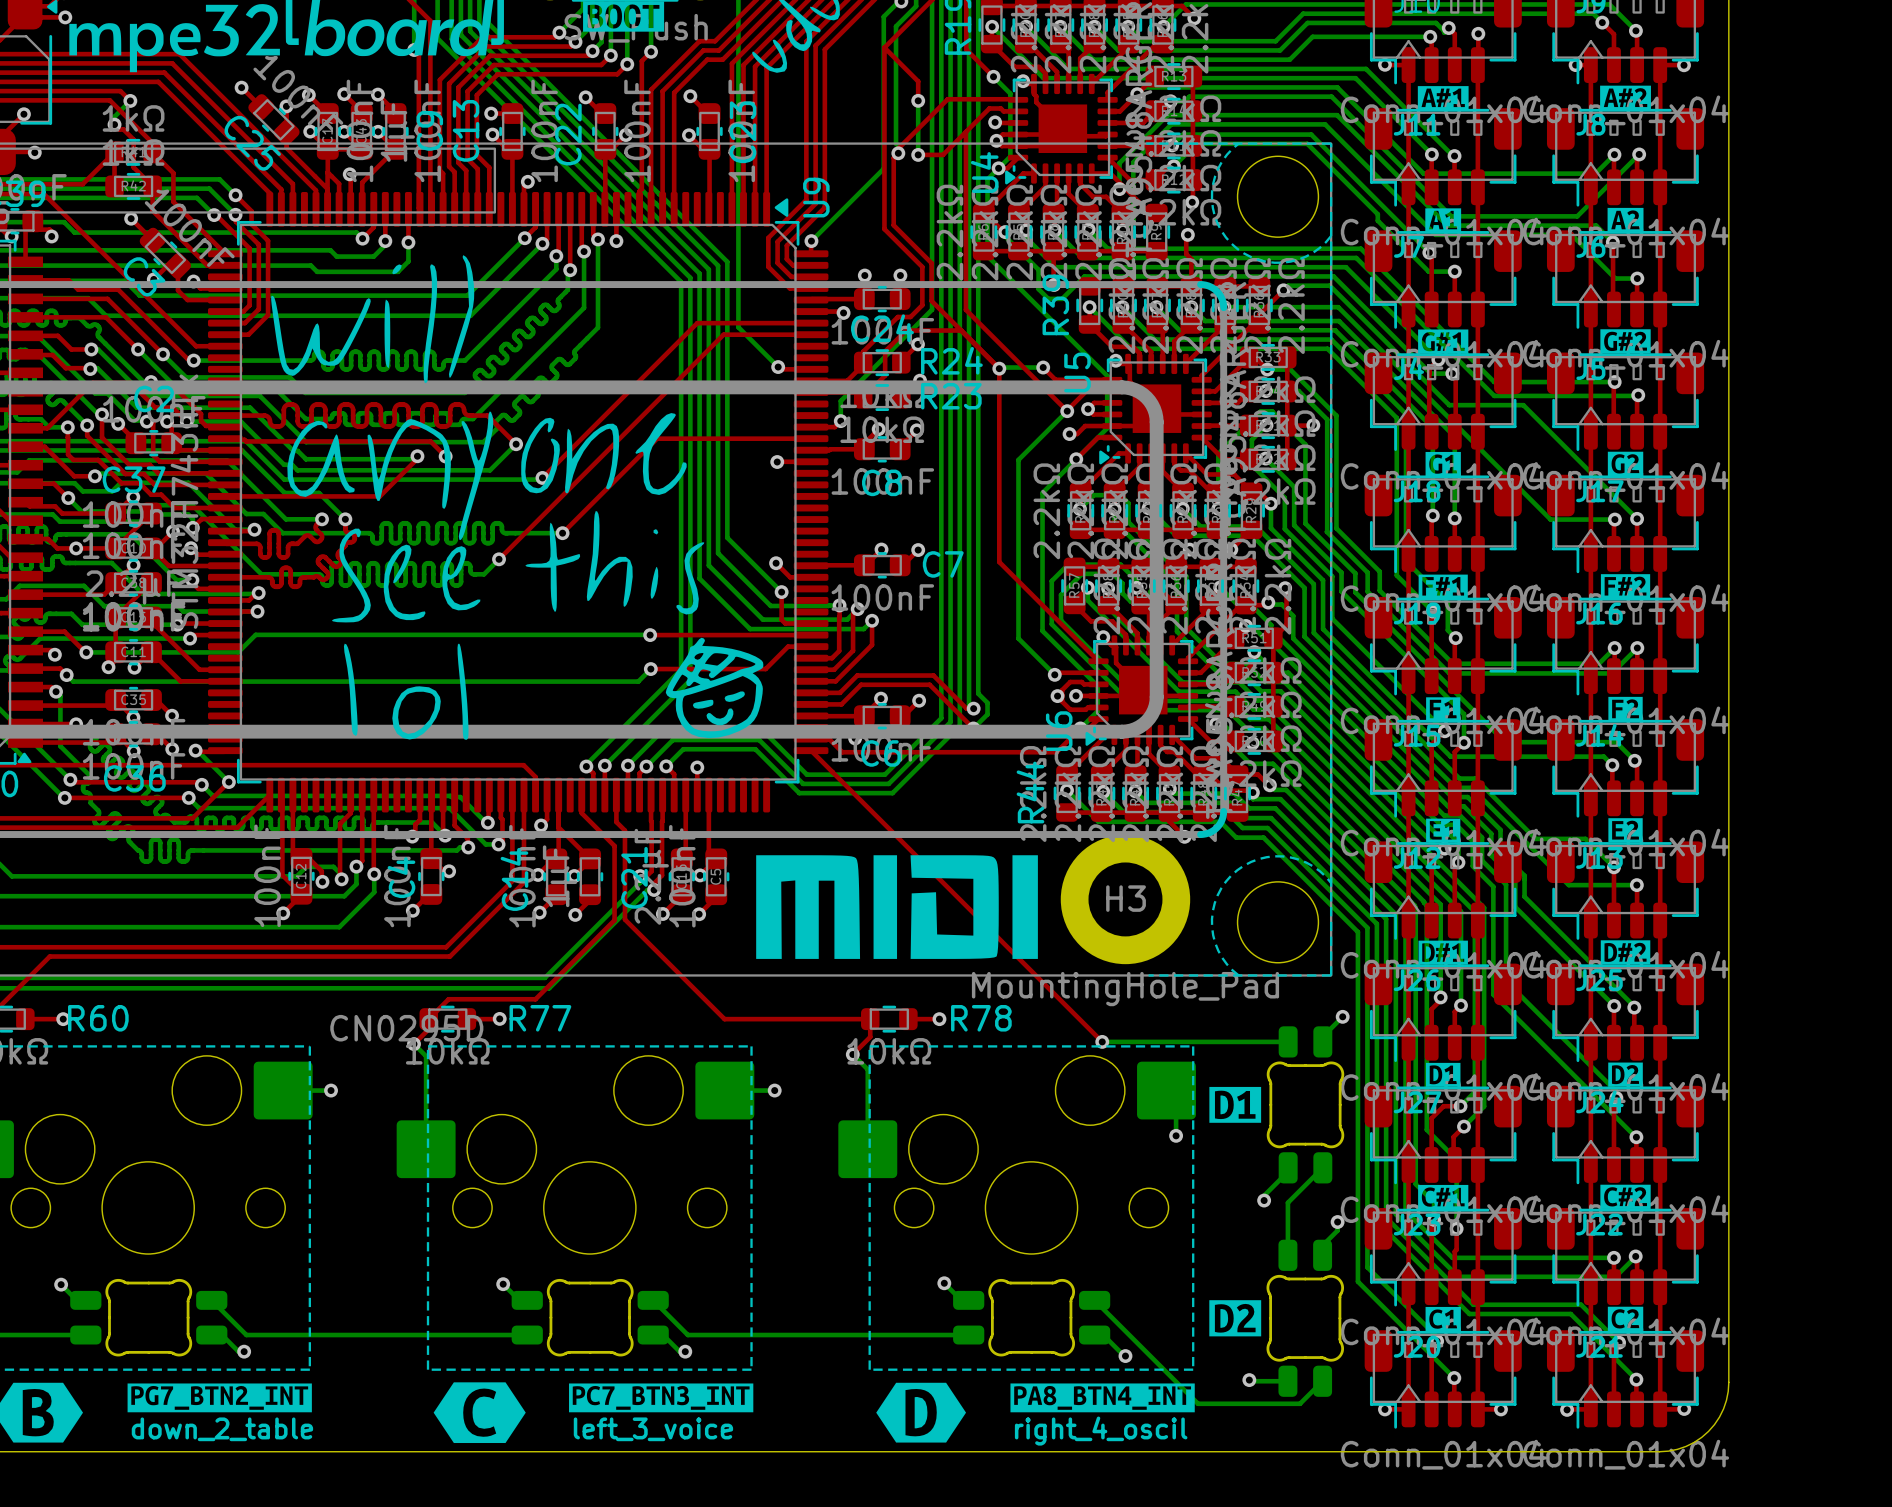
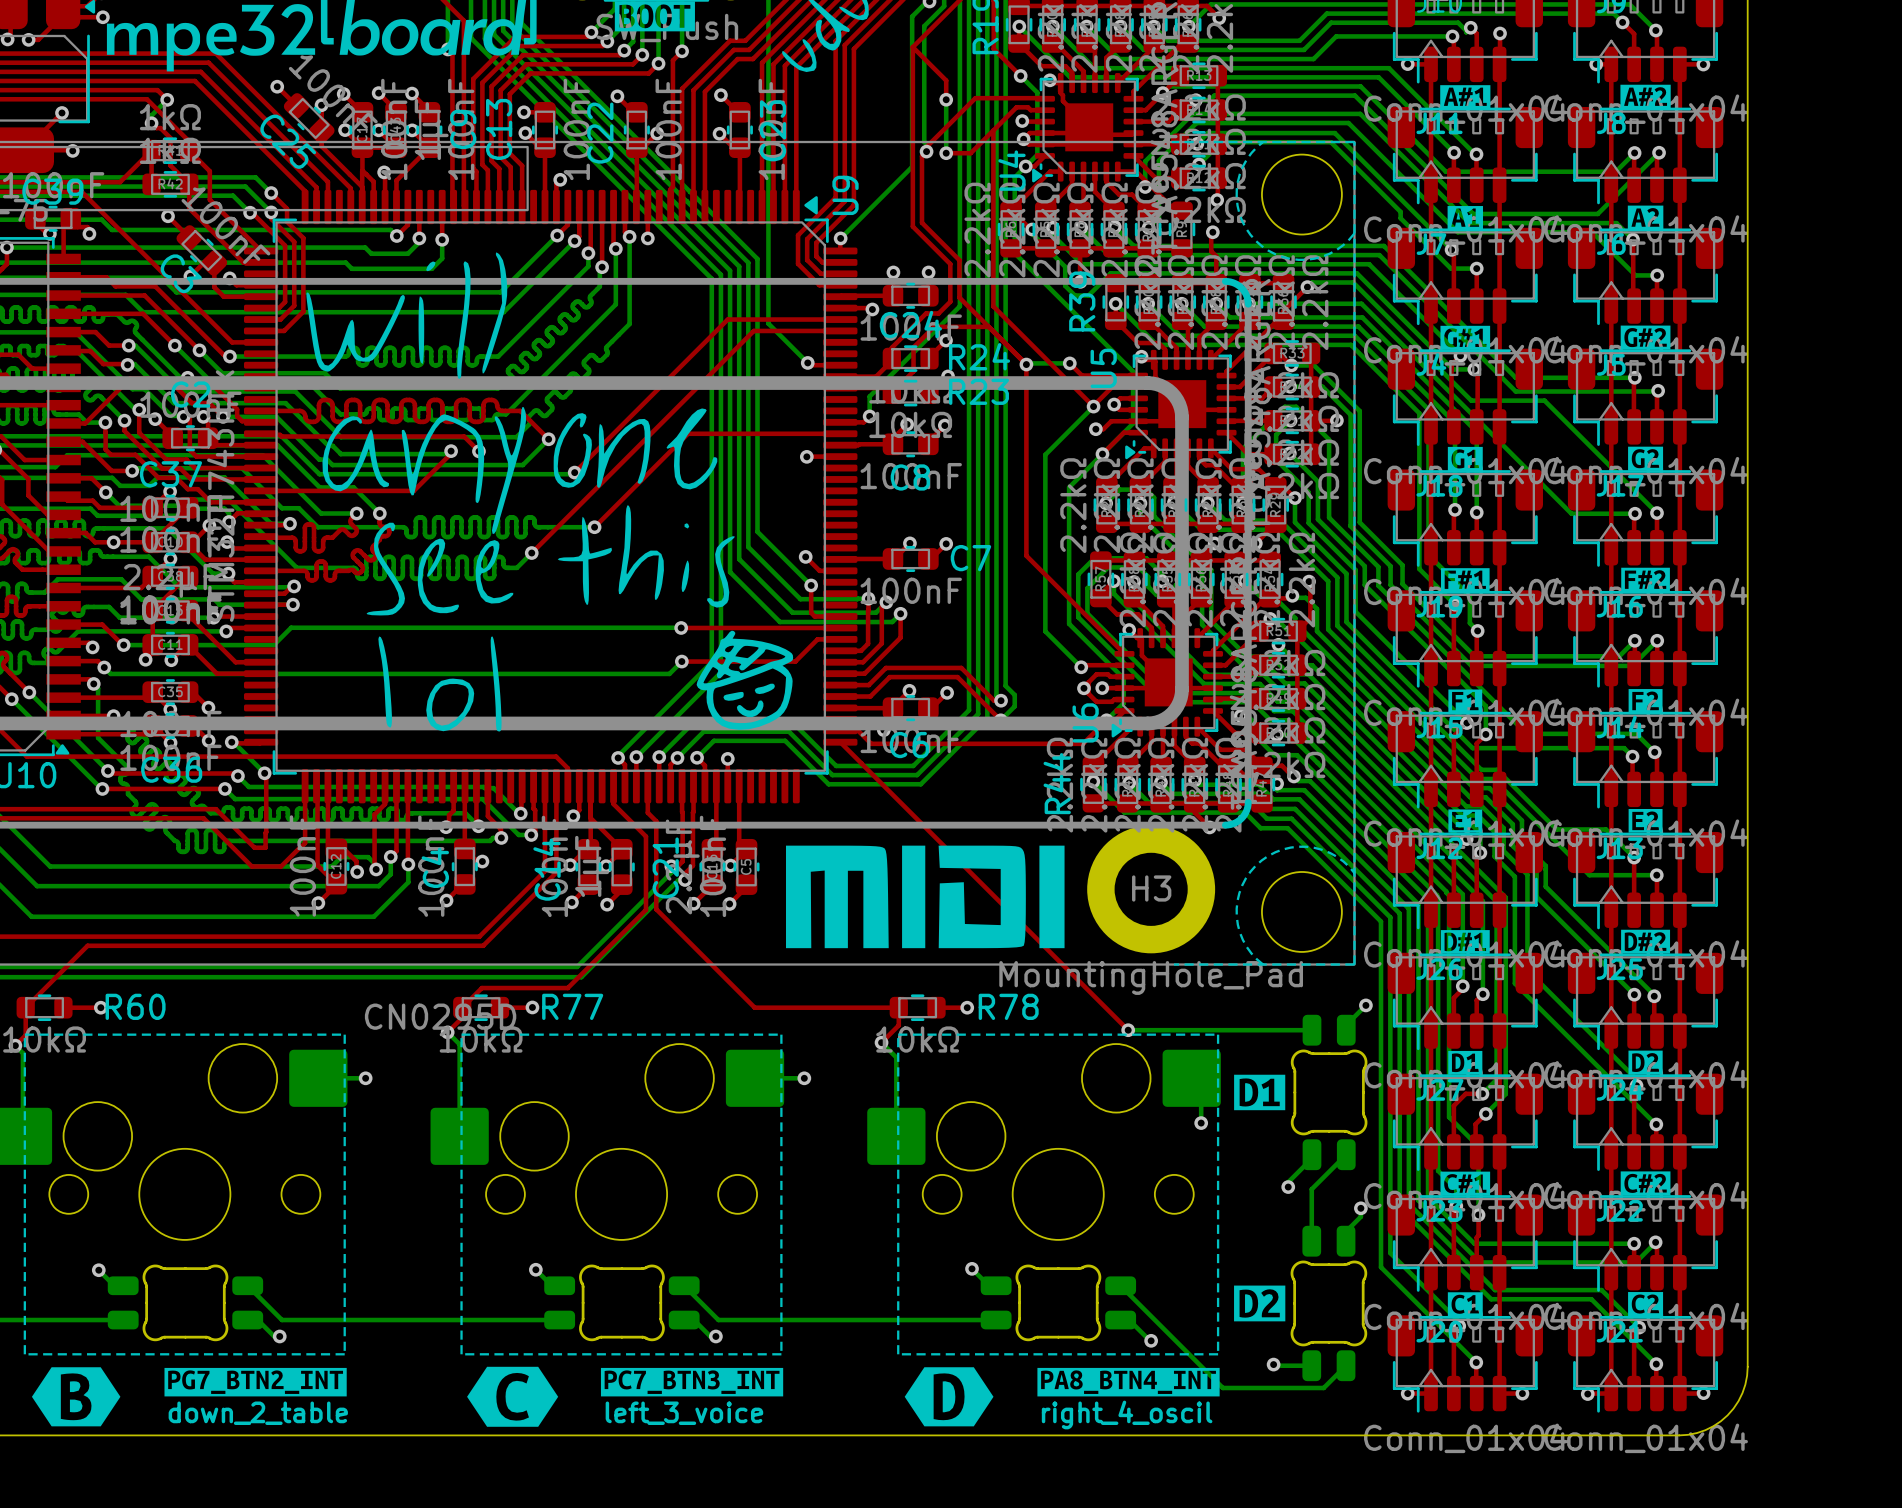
top track: (228, 782) (192, 818) (179, 818) -> (264, 773) (266, 774) (265, 847) (254, 847) (215, 809)
top track: (269, 795) (237, 827) (167, 827) -> (299, 847) (281, 866) (251, 866) (203, 818)
top track: none -> (305, 786) (305, 843) (300, 847)

